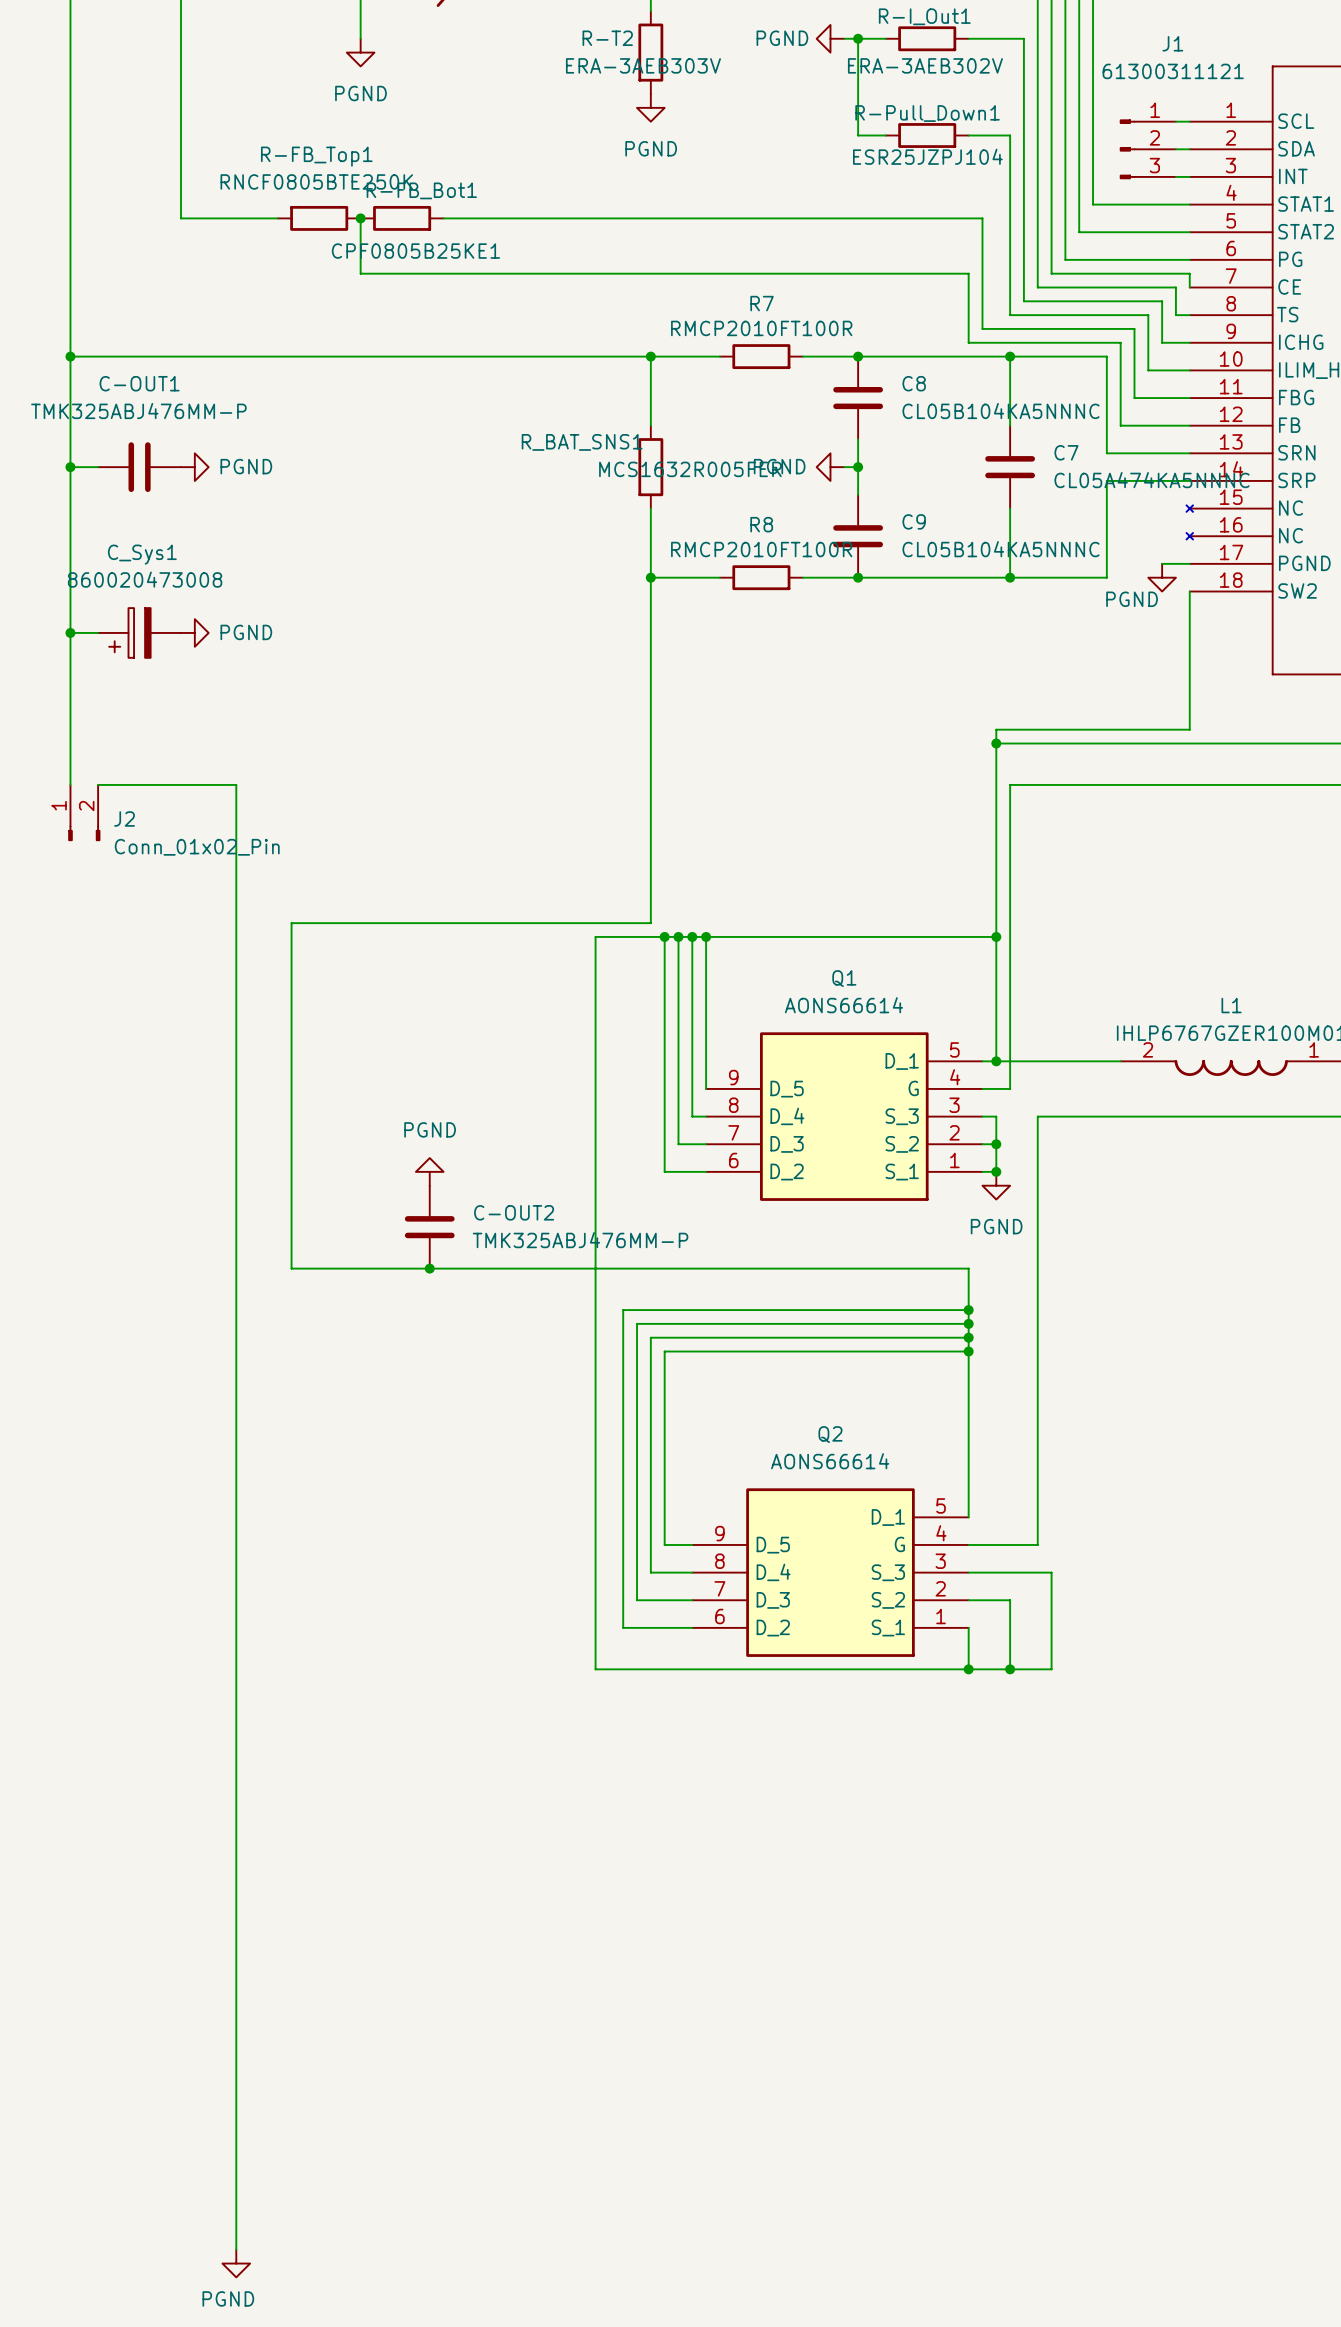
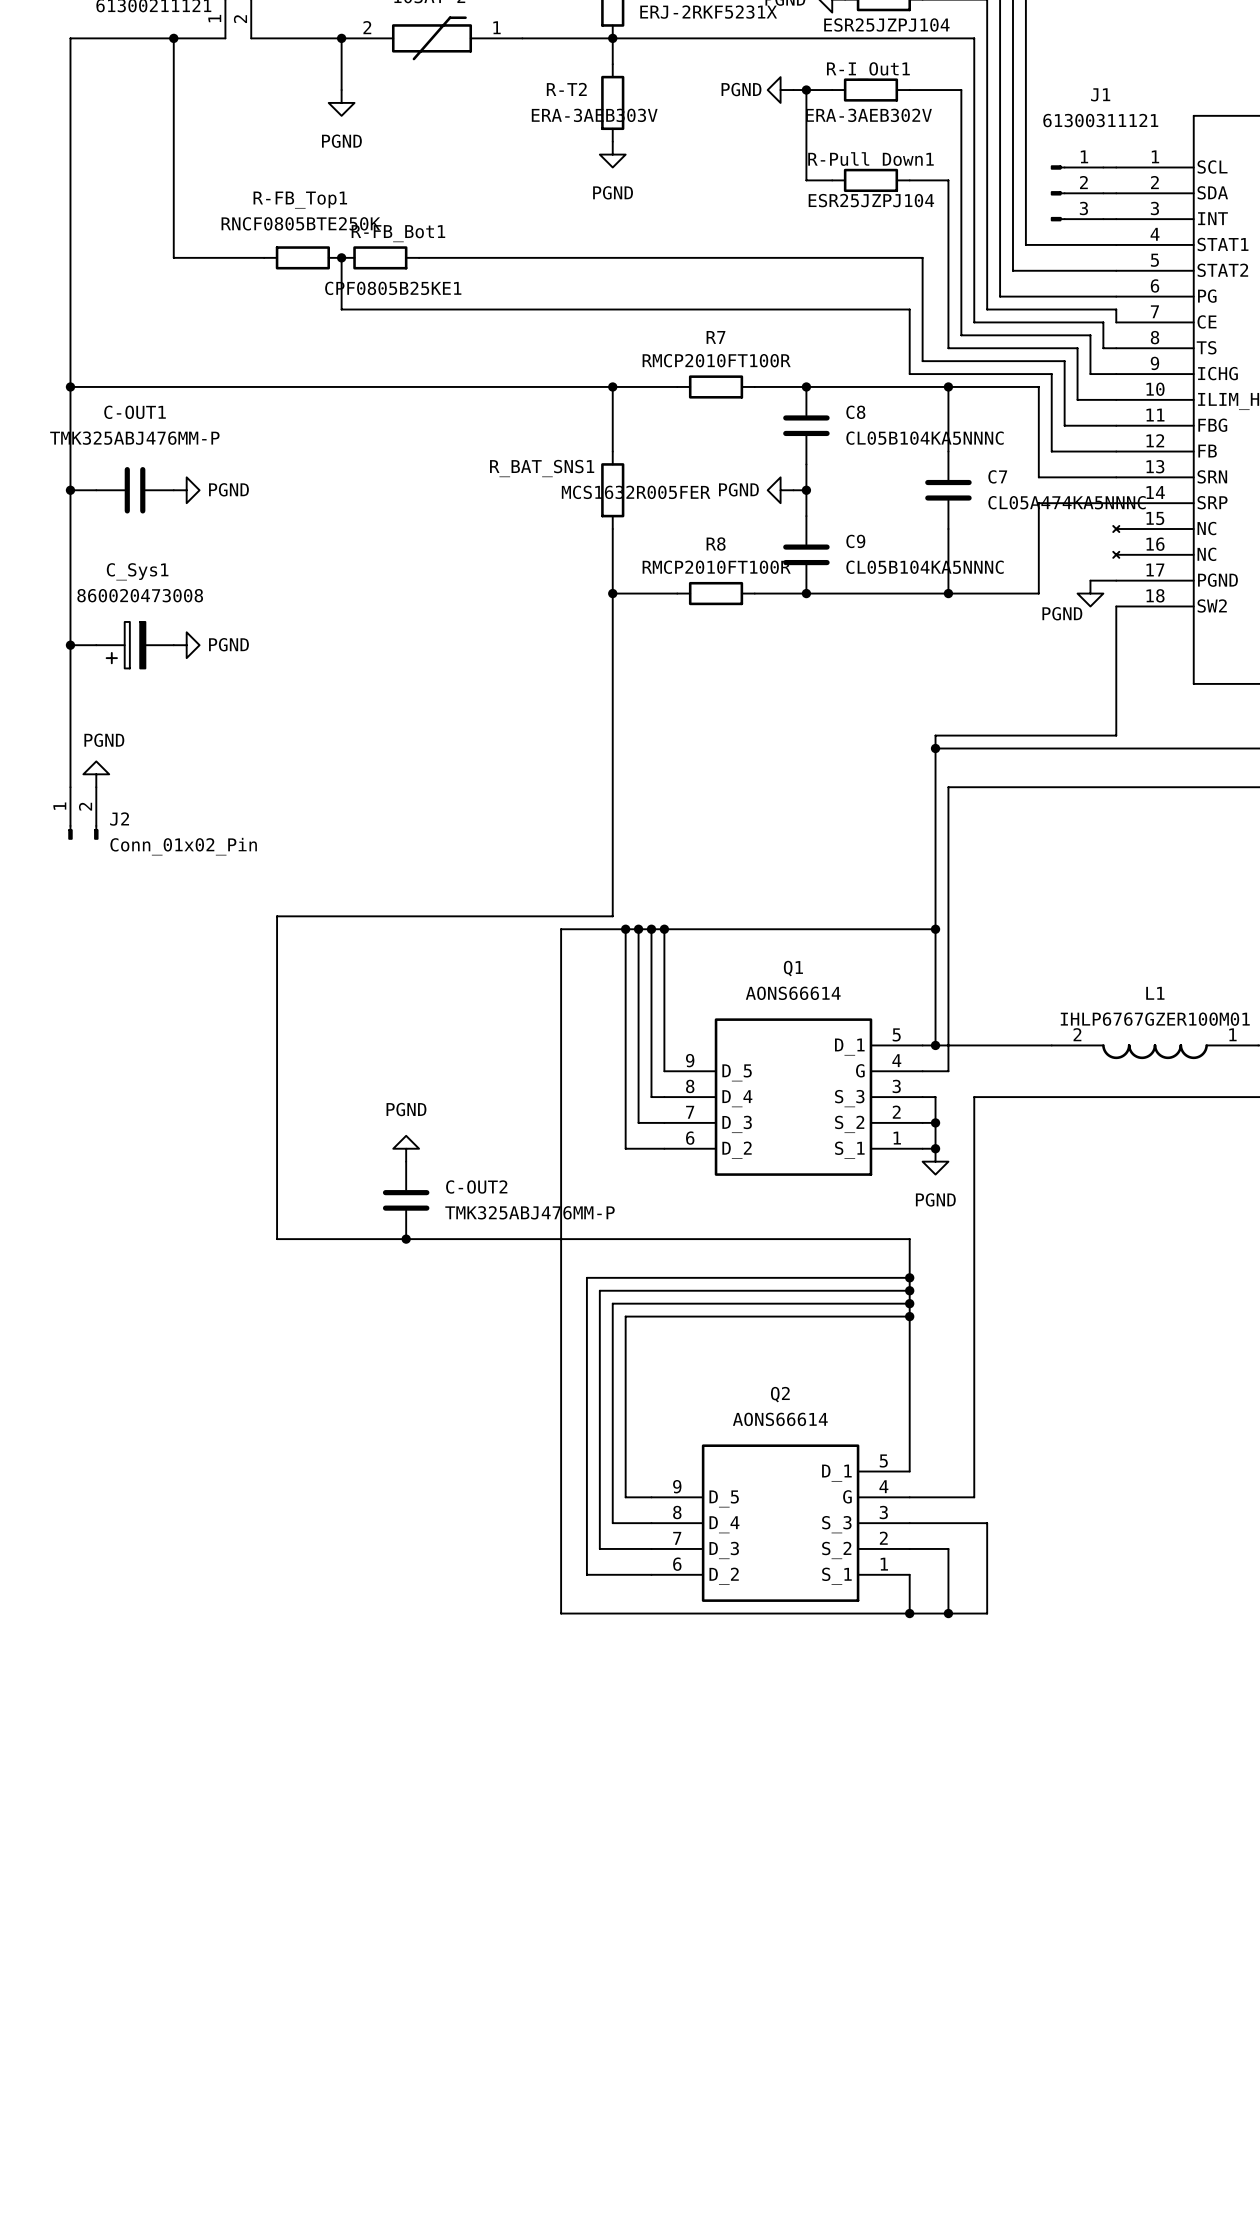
power symbol: none -> PGND (96, 774)
wire: (98, 784) (236, 784) (236, 2249) -> none
power symbol: PGND (236, 2263) -> none

